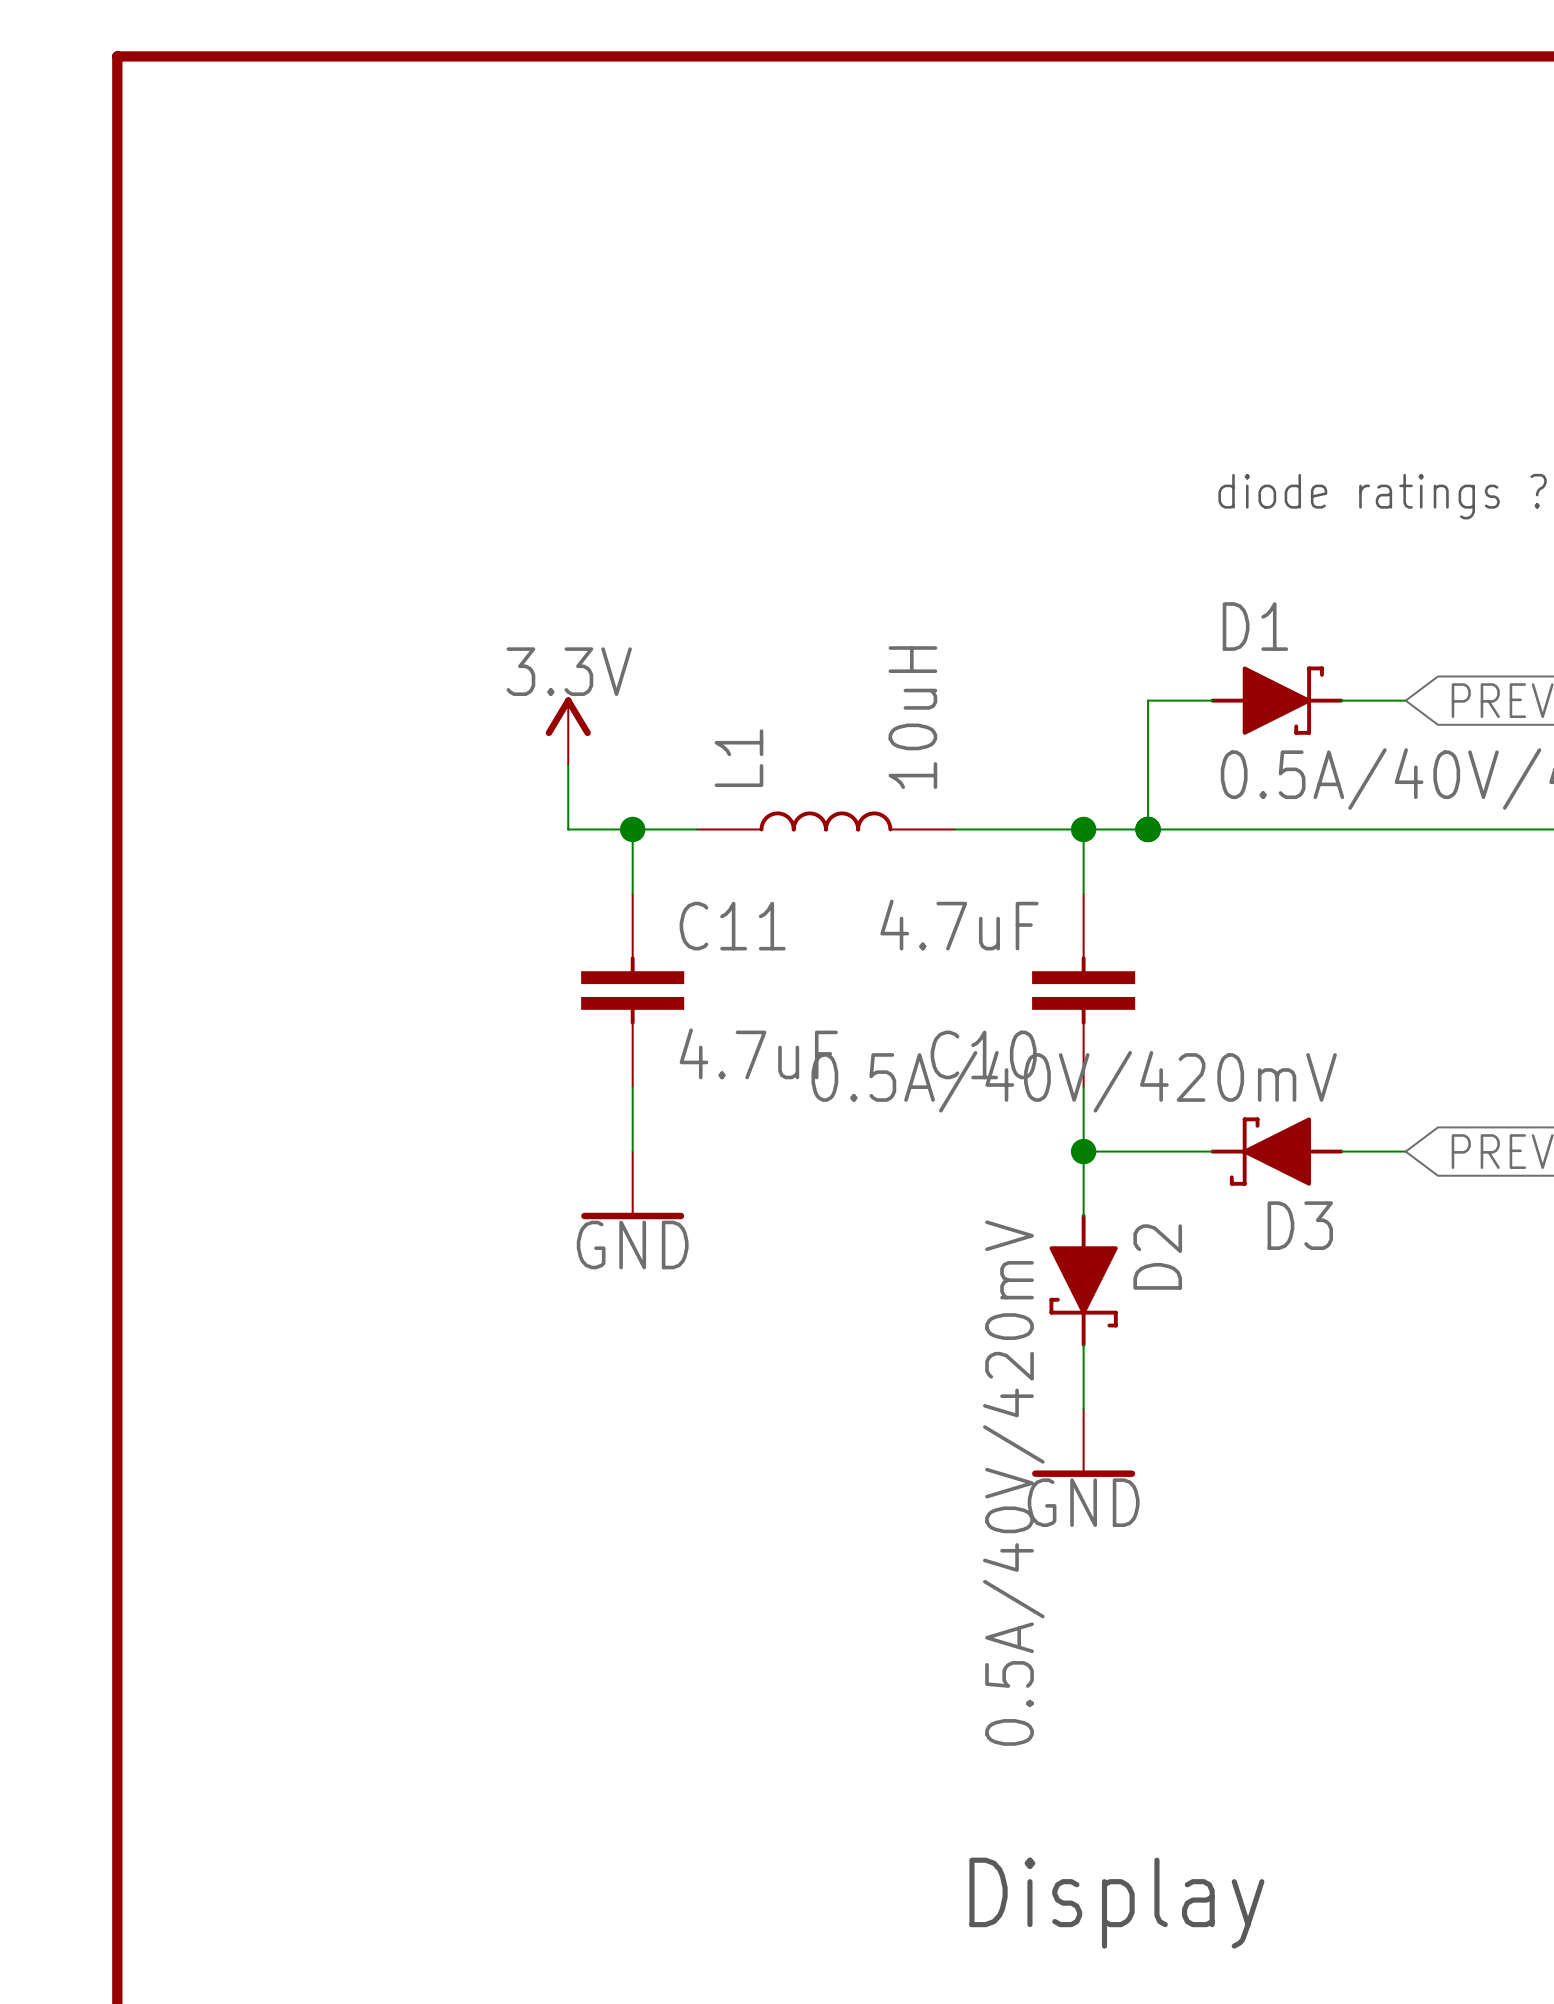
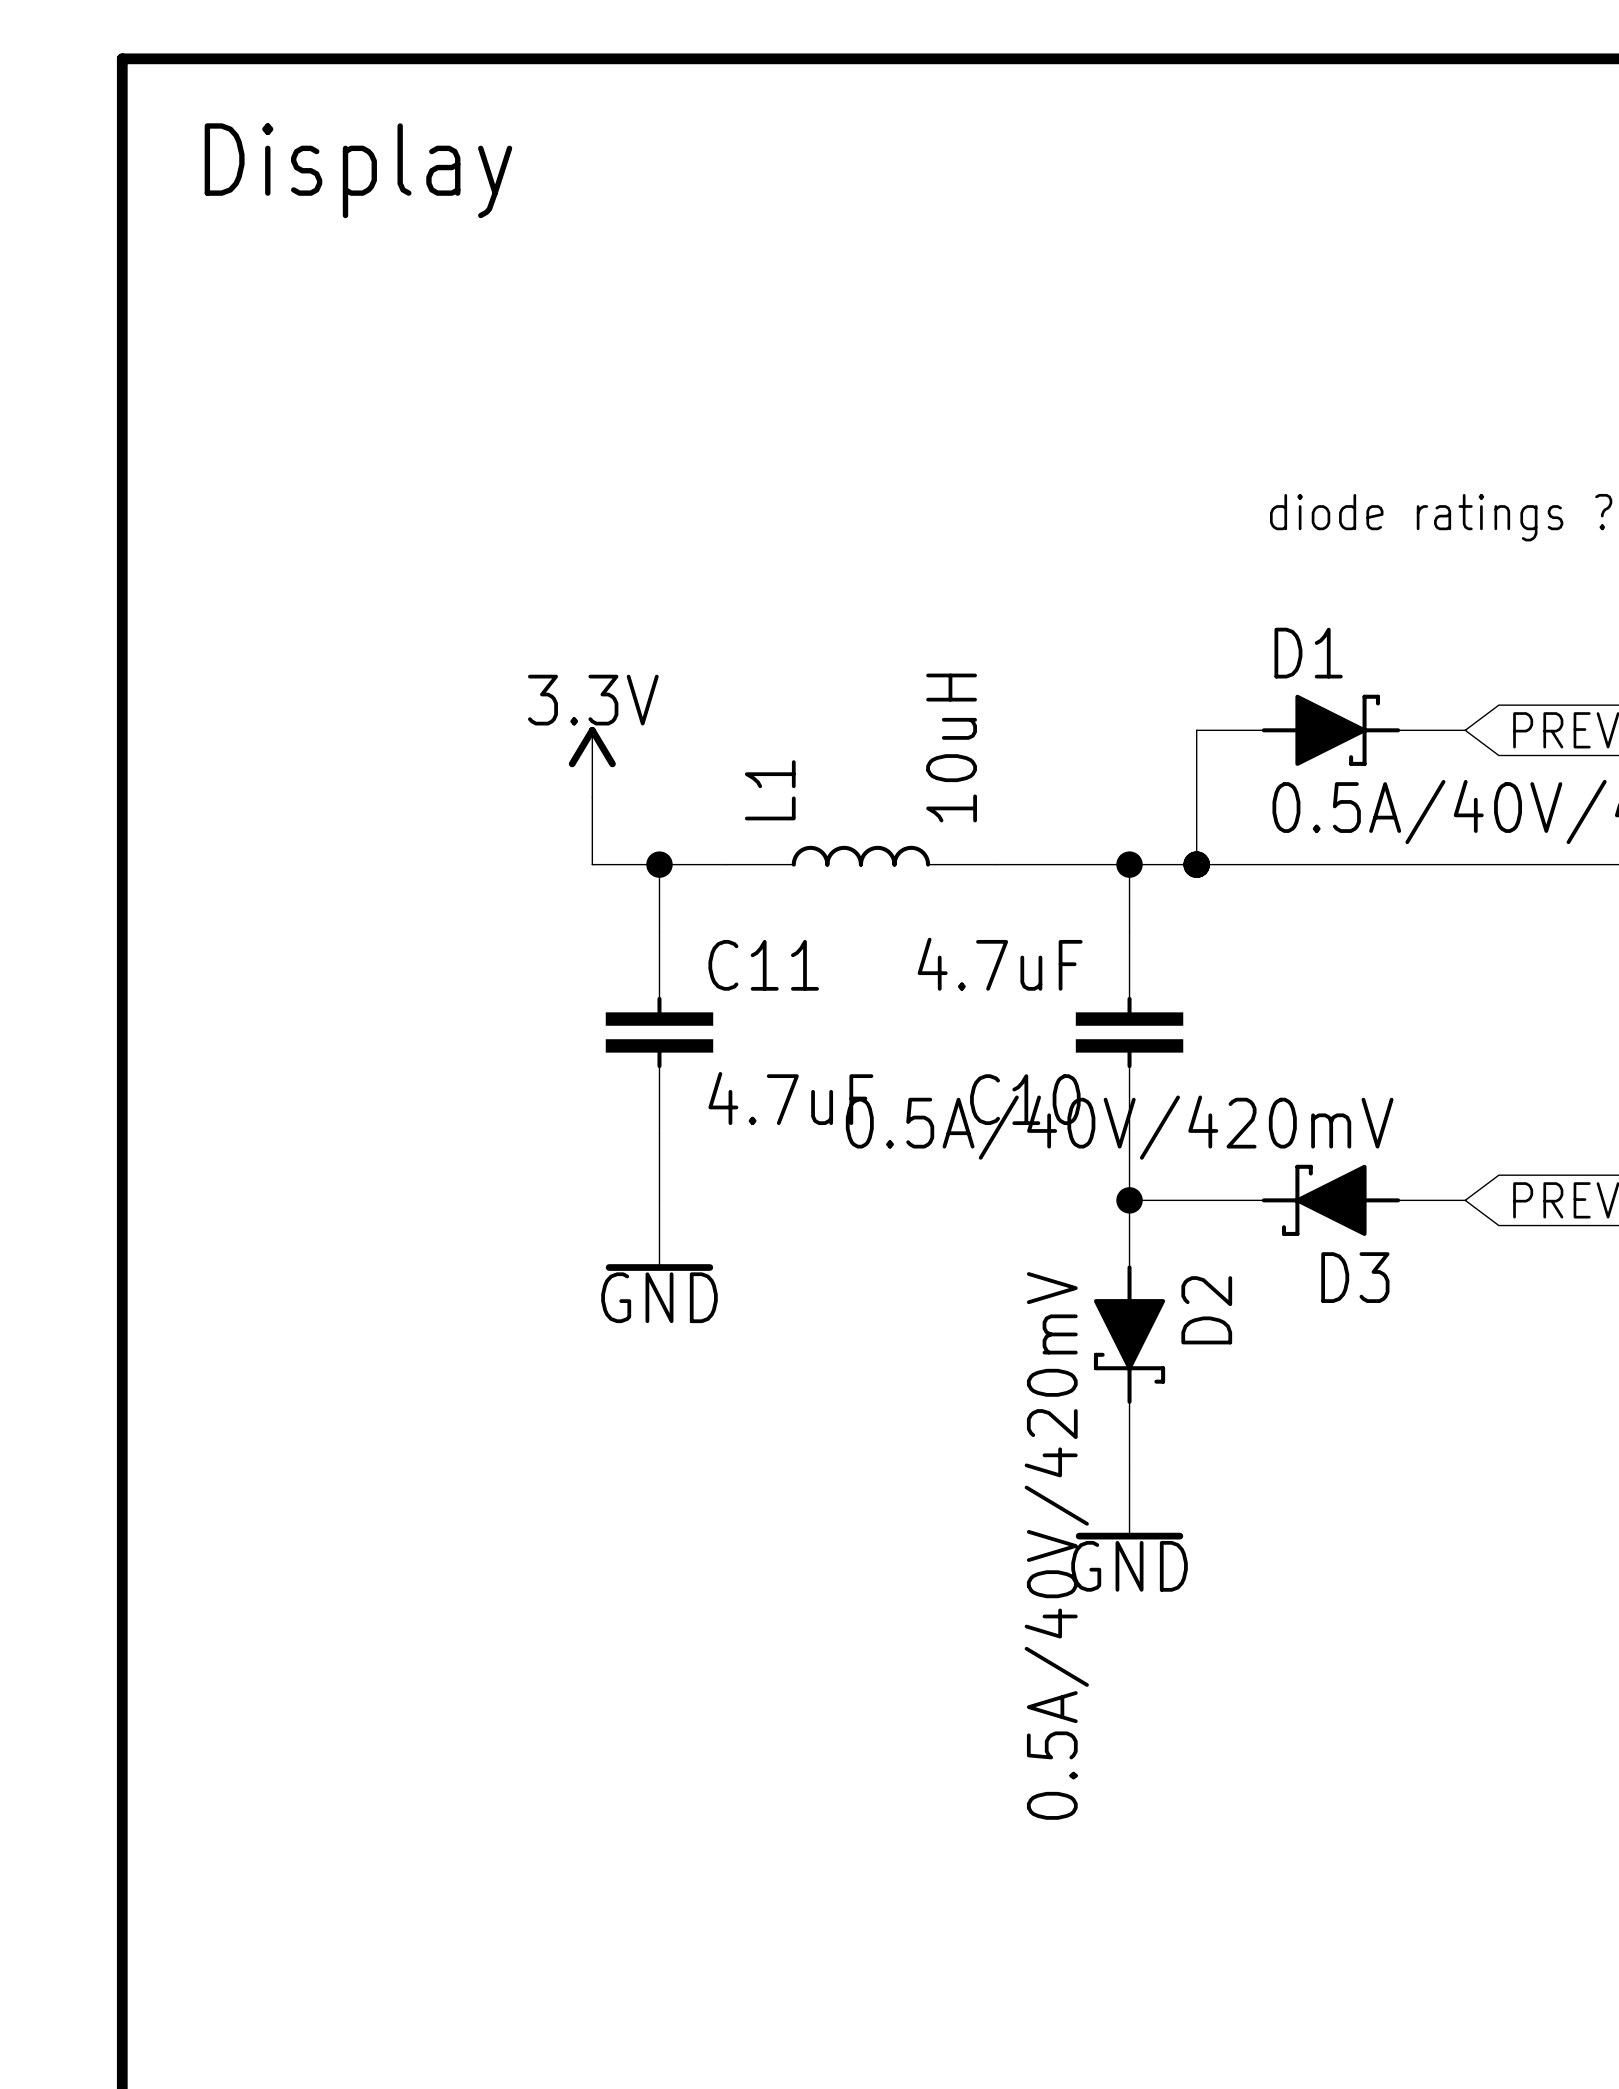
text: none -> Display (358, 170)
text: Display (1116, 1903) -> none

